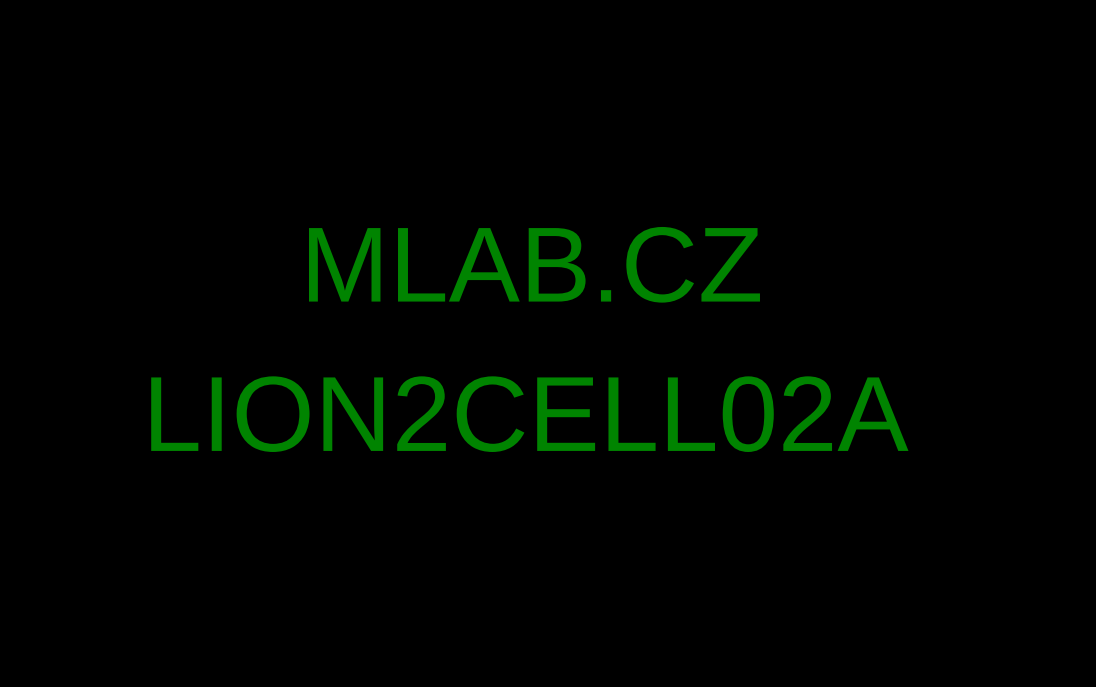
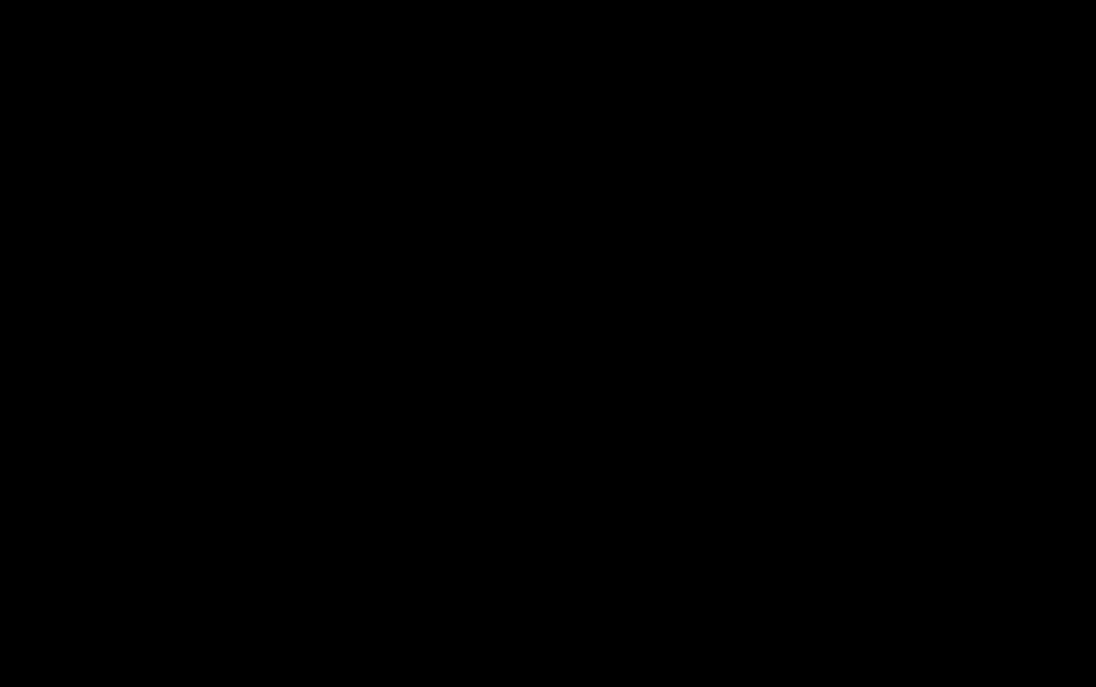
text: MLAB.CZ (534, 264) -> none
text: LION2CELL02A (529, 414) -> none

